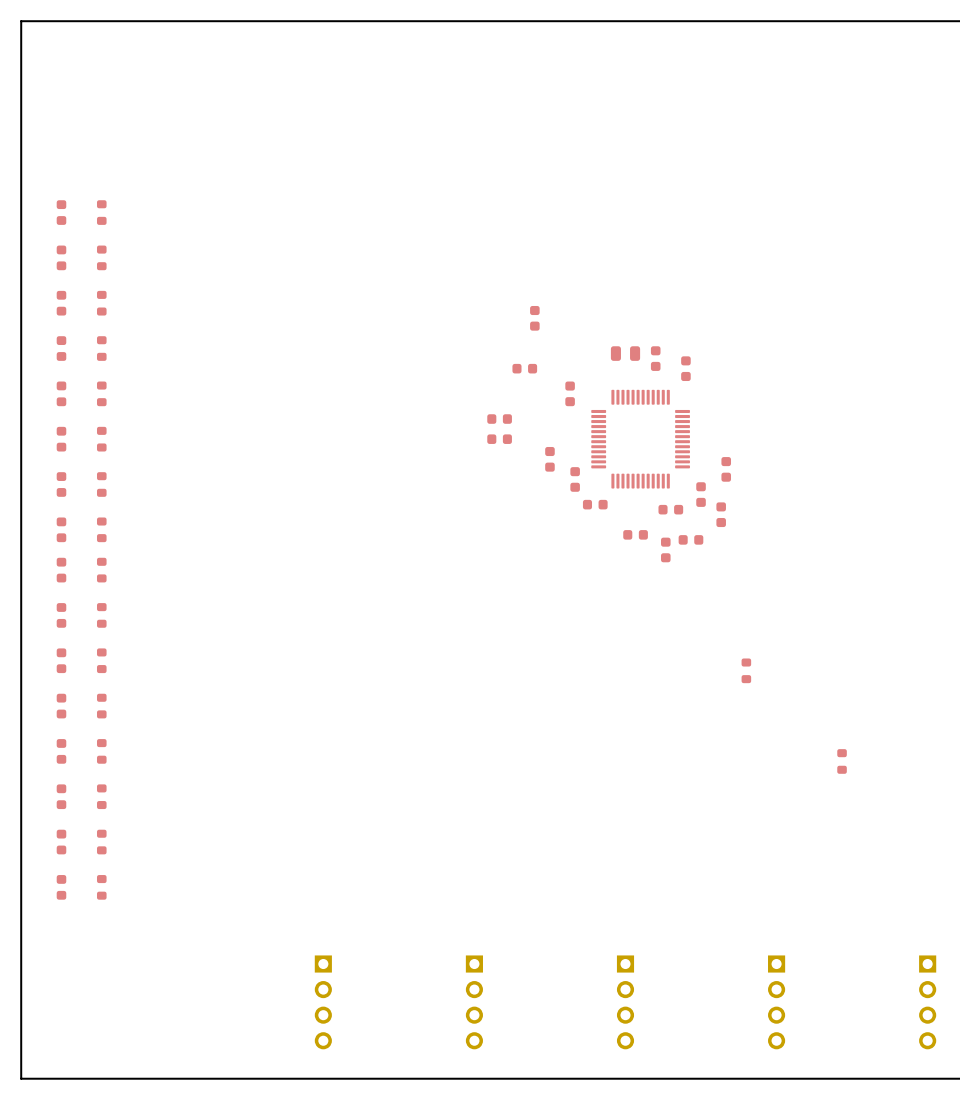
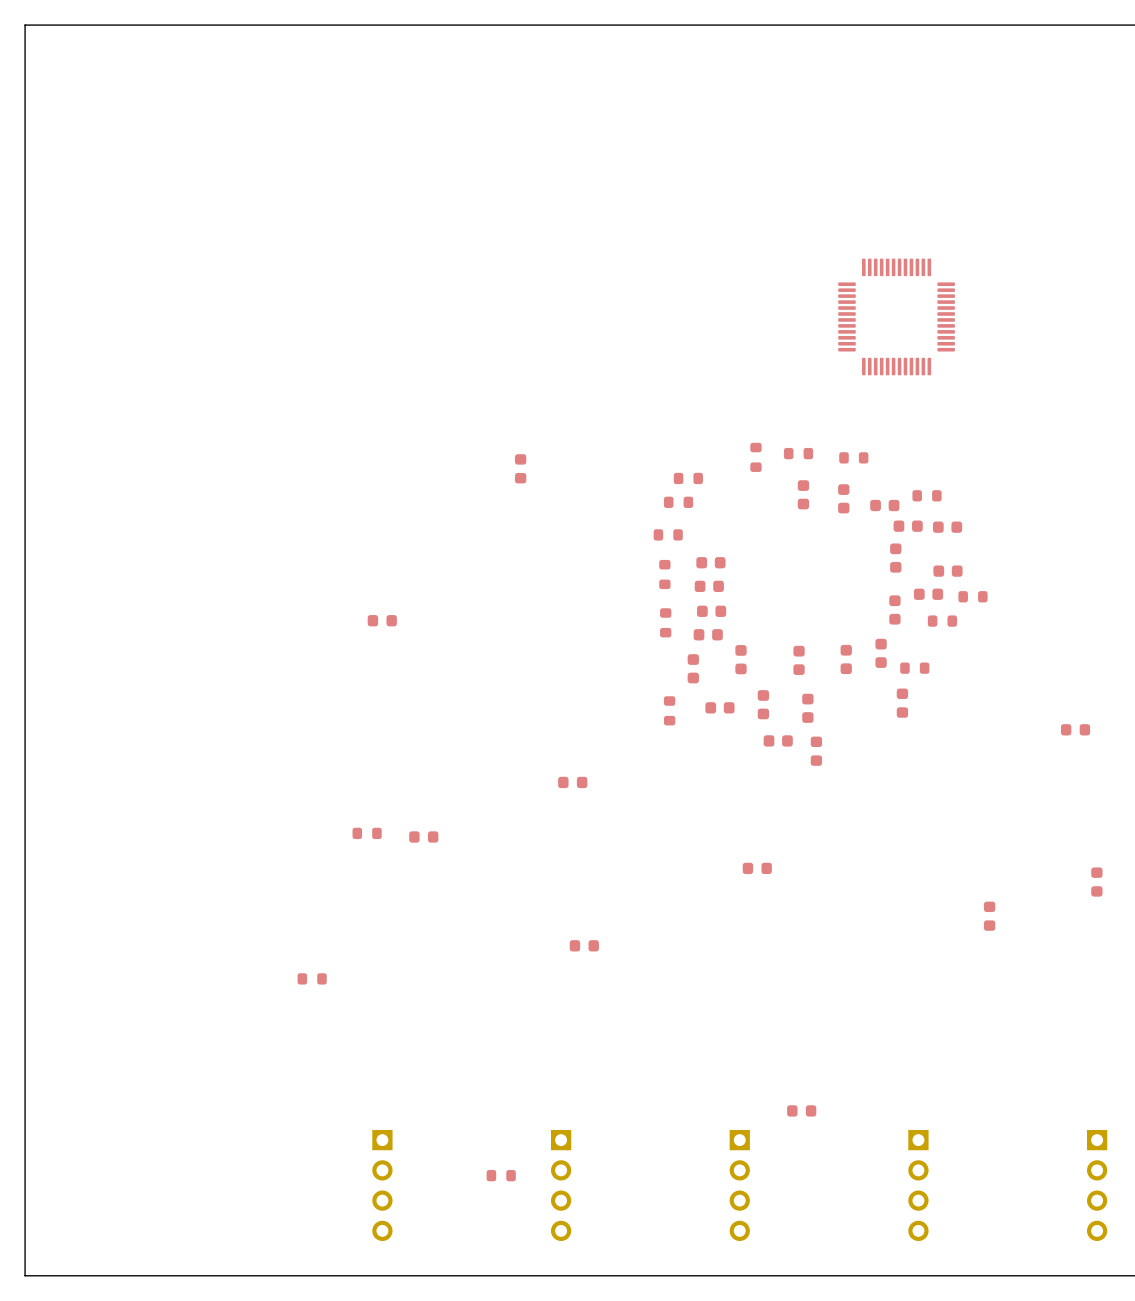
part: (61, 212) -> none
part: (101, 212) -> none
part: (61, 257) -> none
part: (101, 257) -> none
part: (61, 303) -> none
part: (101, 303) -> none
part: (534, 318) -> none
part: (61, 348) -> none
part: (101, 348) -> none
part: (625, 353) -> none
part: (655, 358) -> none
part: (524, 368) -> none
part: (685, 368) -> none
part: none -> (798, 453)
part: none -> (755, 457)
part: none -> (853, 457)
part: (61, 393) -> none
part: (101, 393) -> none
part: (570, 393) -> none
part: none -> (520, 468)
part: none -> (688, 478)
part: none -> (803, 494)
part: (499, 419) -> none
part: none -> (927, 495)
part: none -> (843, 498)
part: none -> (678, 502)
part: none -> (884, 505)
part: (61, 439) -> none
part: (101, 439) -> none
part: (499, 439) -> none
part position: (640, 439) -> (896, 316)
part: none -> (908, 526)
part: none -> (947, 527)
part: none -> (668, 534)
part: (549, 459) -> none
part: (726, 469) -> none
part: none -> (895, 558)
part: none -> (710, 562)
part: (575, 479) -> none
part: none -> (947, 571)
part: (61, 484) -> none
part: (101, 484) -> none
part: none -> (664, 574)
part: (701, 494) -> none
part: none -> (709, 586)
part: none -> (928, 594)
part: (595, 504) -> none
part: none -> (973, 596)
part: (670, 509) -> none
part: (721, 514) -> none
part: none -> (894, 609)
part: none -> (711, 611)
part: none -> (382, 620)
part: none -> (942, 621)
part: none -> (665, 622)
part: (61, 529) -> none
part: (101, 529) -> none
part: (635, 534) -> none
part: none -> (708, 634)
part: (690, 539) -> none
part: (665, 549) -> none
part: none -> (881, 653)
part: none -> (740, 659)
part: none -> (846, 659)
part: none -> (799, 660)
part: none -> (914, 668)
part: none -> (693, 668)
part: (61, 570) -> none
part: (101, 570) -> none
part: none -> (902, 703)
part: none -> (763, 704)
part: none -> (719, 707)
part: none -> (807, 708)
part: none -> (669, 710)
part: (61, 615) -> none
part: (101, 615) -> none
part: none -> (1075, 729)
part: none -> (778, 740)
part: none -> (816, 751)
part: (61, 660) -> none
part: (101, 660) -> none
part: none -> (572, 782)
part: (746, 670) -> none
part: none -> (367, 833)
part: (61, 706) -> none
part: (101, 706) -> none
part: none -> (423, 836)
part: none -> (757, 868)
part: none -> (1096, 882)
part: (61, 751) -> none
part: (101, 751) -> none
part: (842, 761) -> none
part: none -> (989, 916)
part: (61, 796) -> none
part: (101, 796) -> none
part: none -> (584, 945)
part: none -> (312, 978)
part: (61, 842) -> none
part: (101, 842) -> none
part: (61, 887) -> none
part: (101, 887) -> none
part: none -> (801, 1110)
part: none -> (501, 1175)

